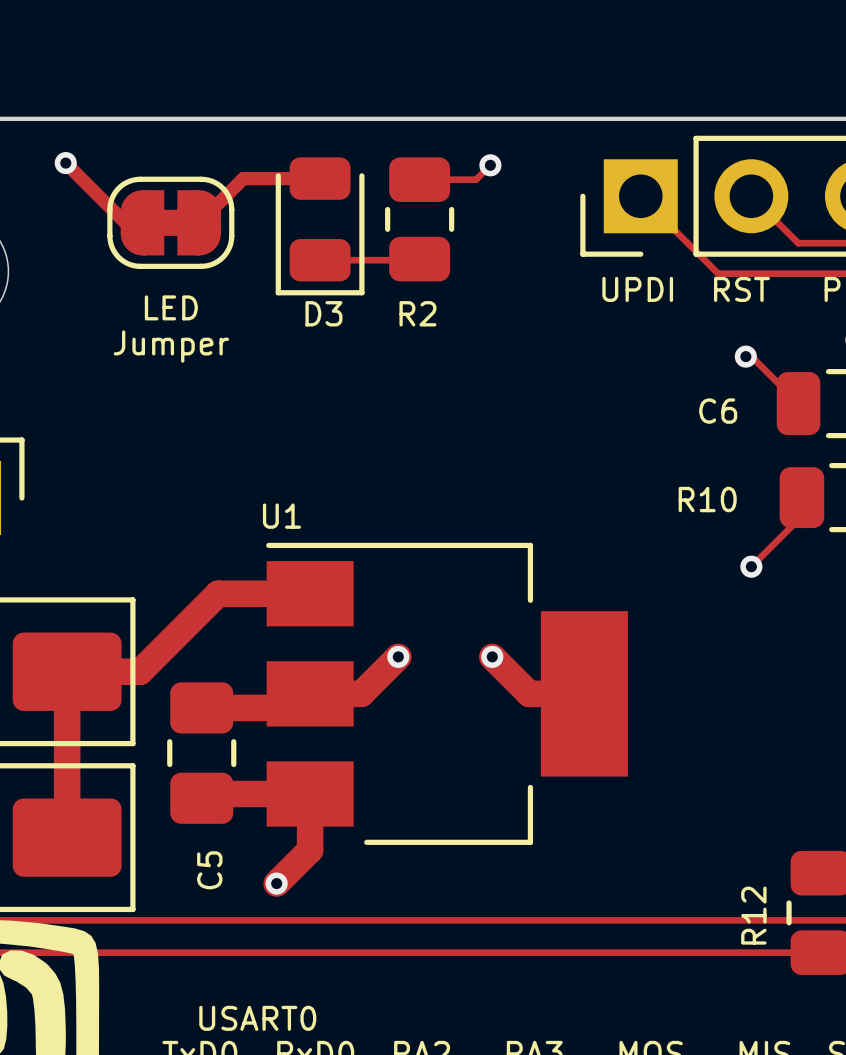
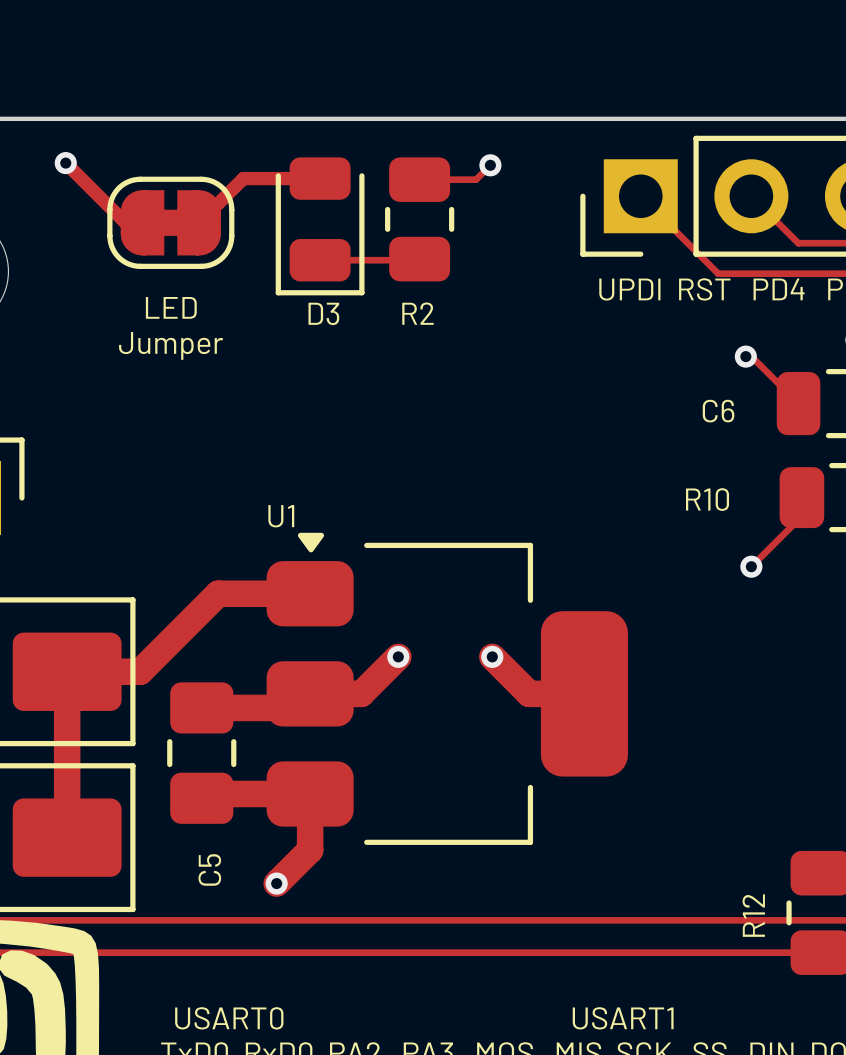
U1 footprint: [266, 542, 628, 845] -> [266, 532, 628, 845]

